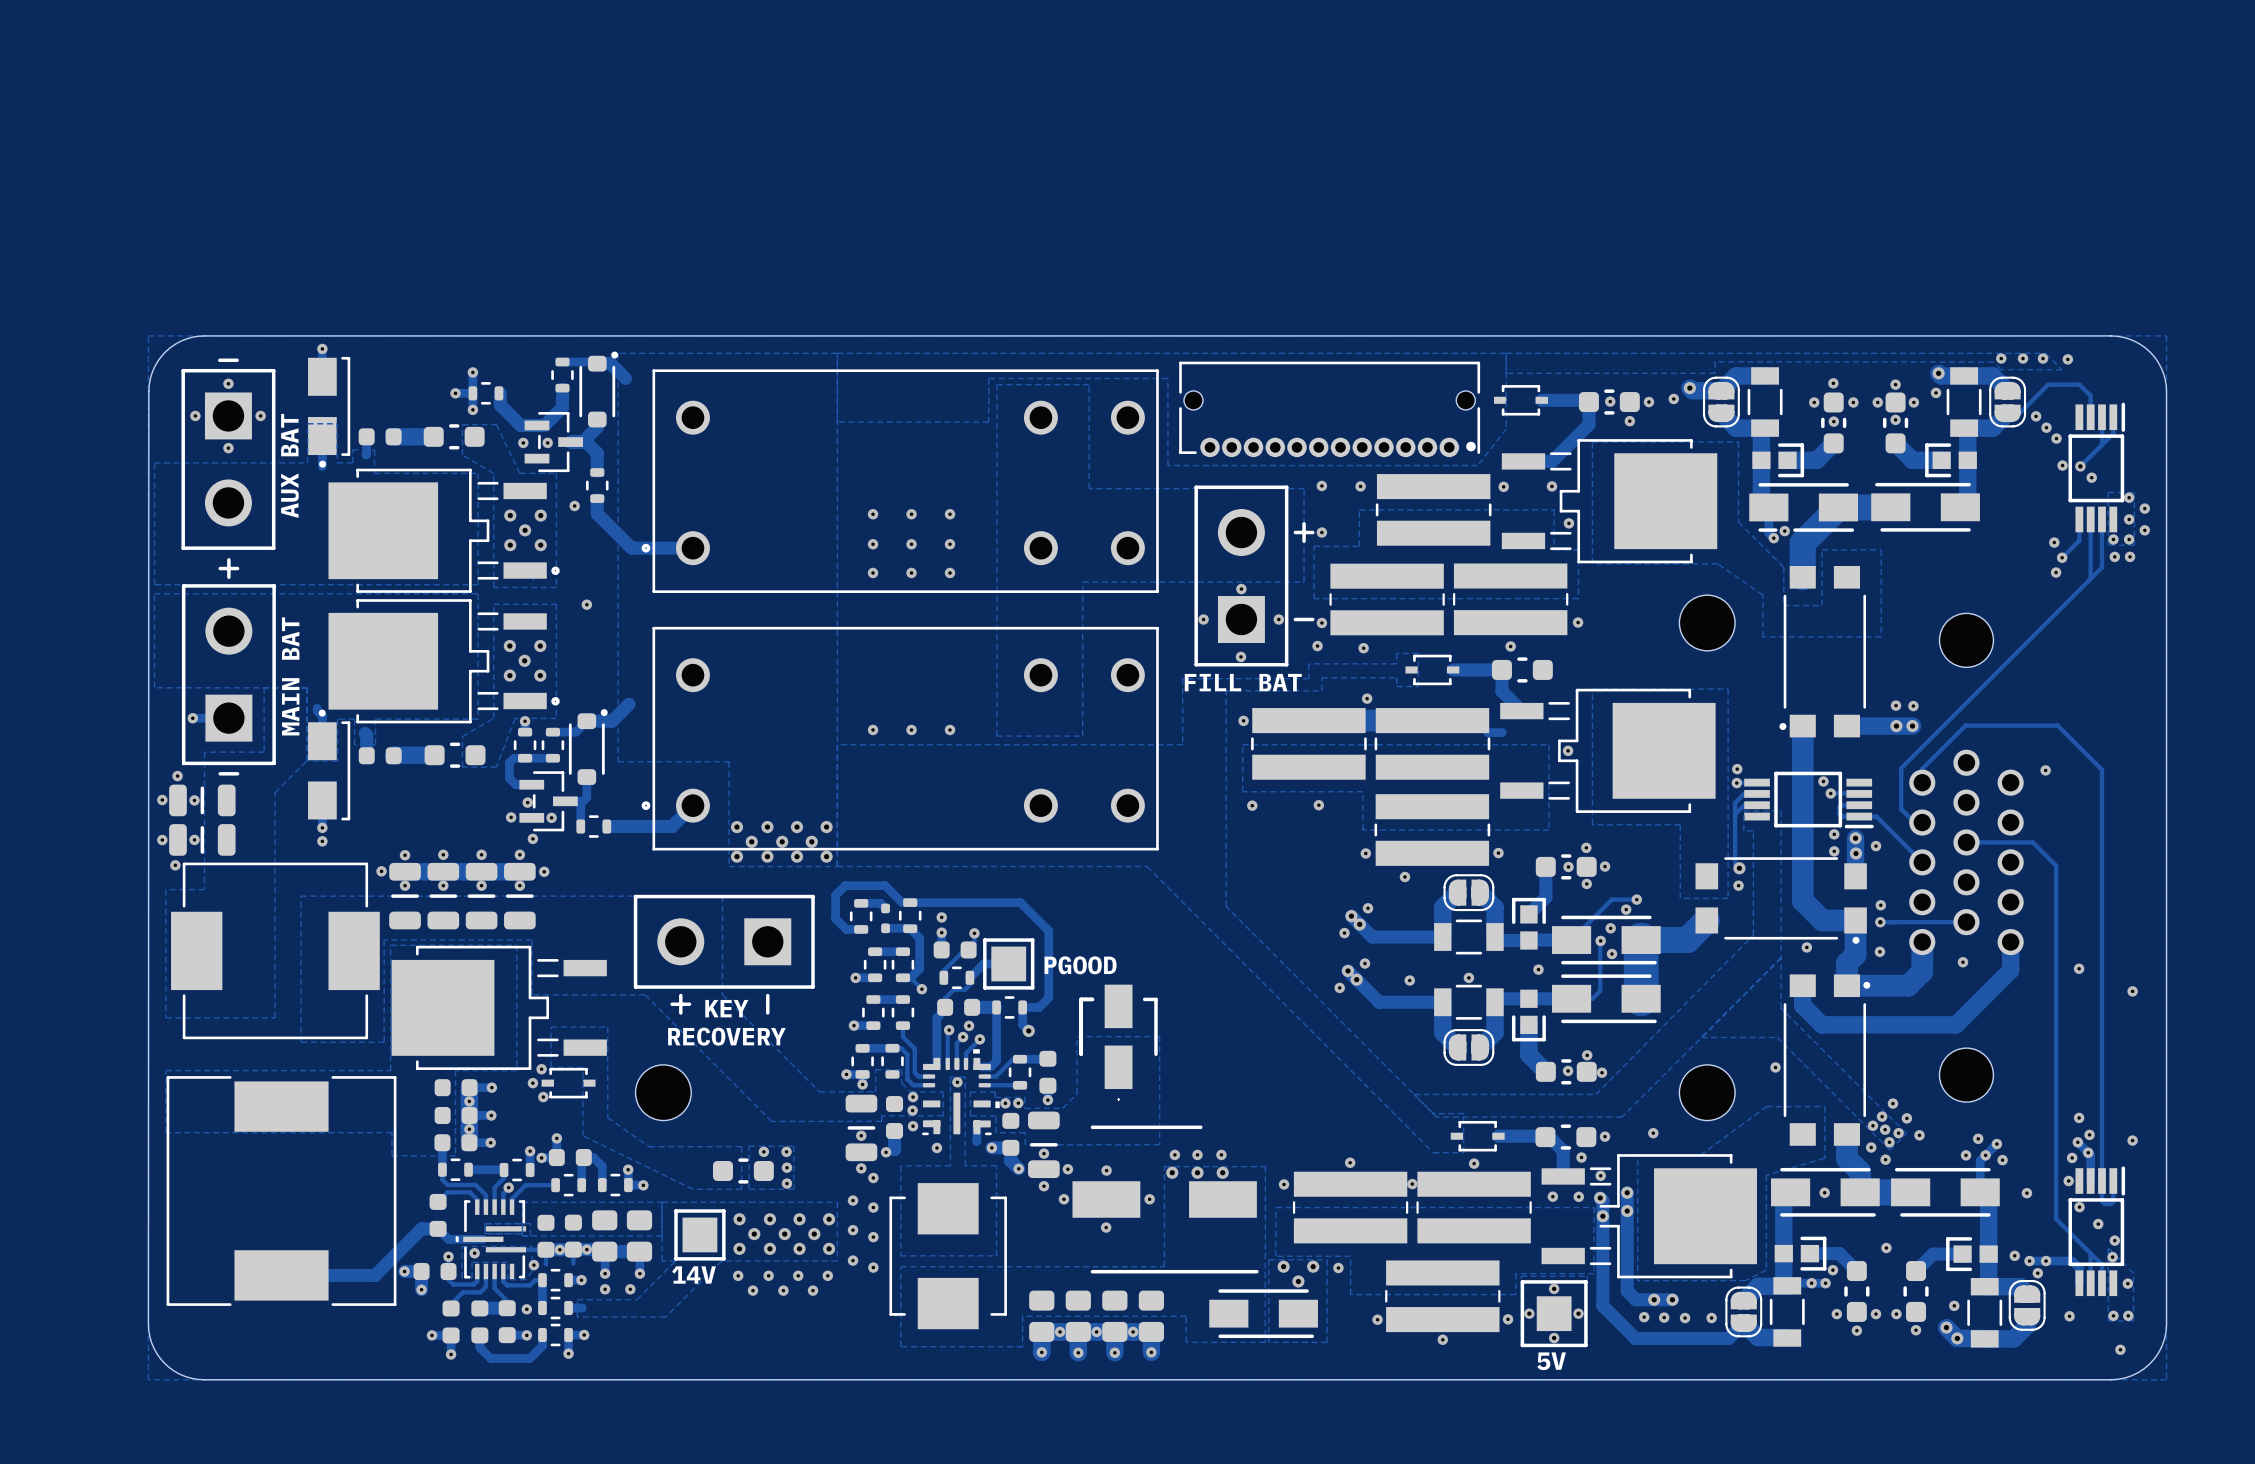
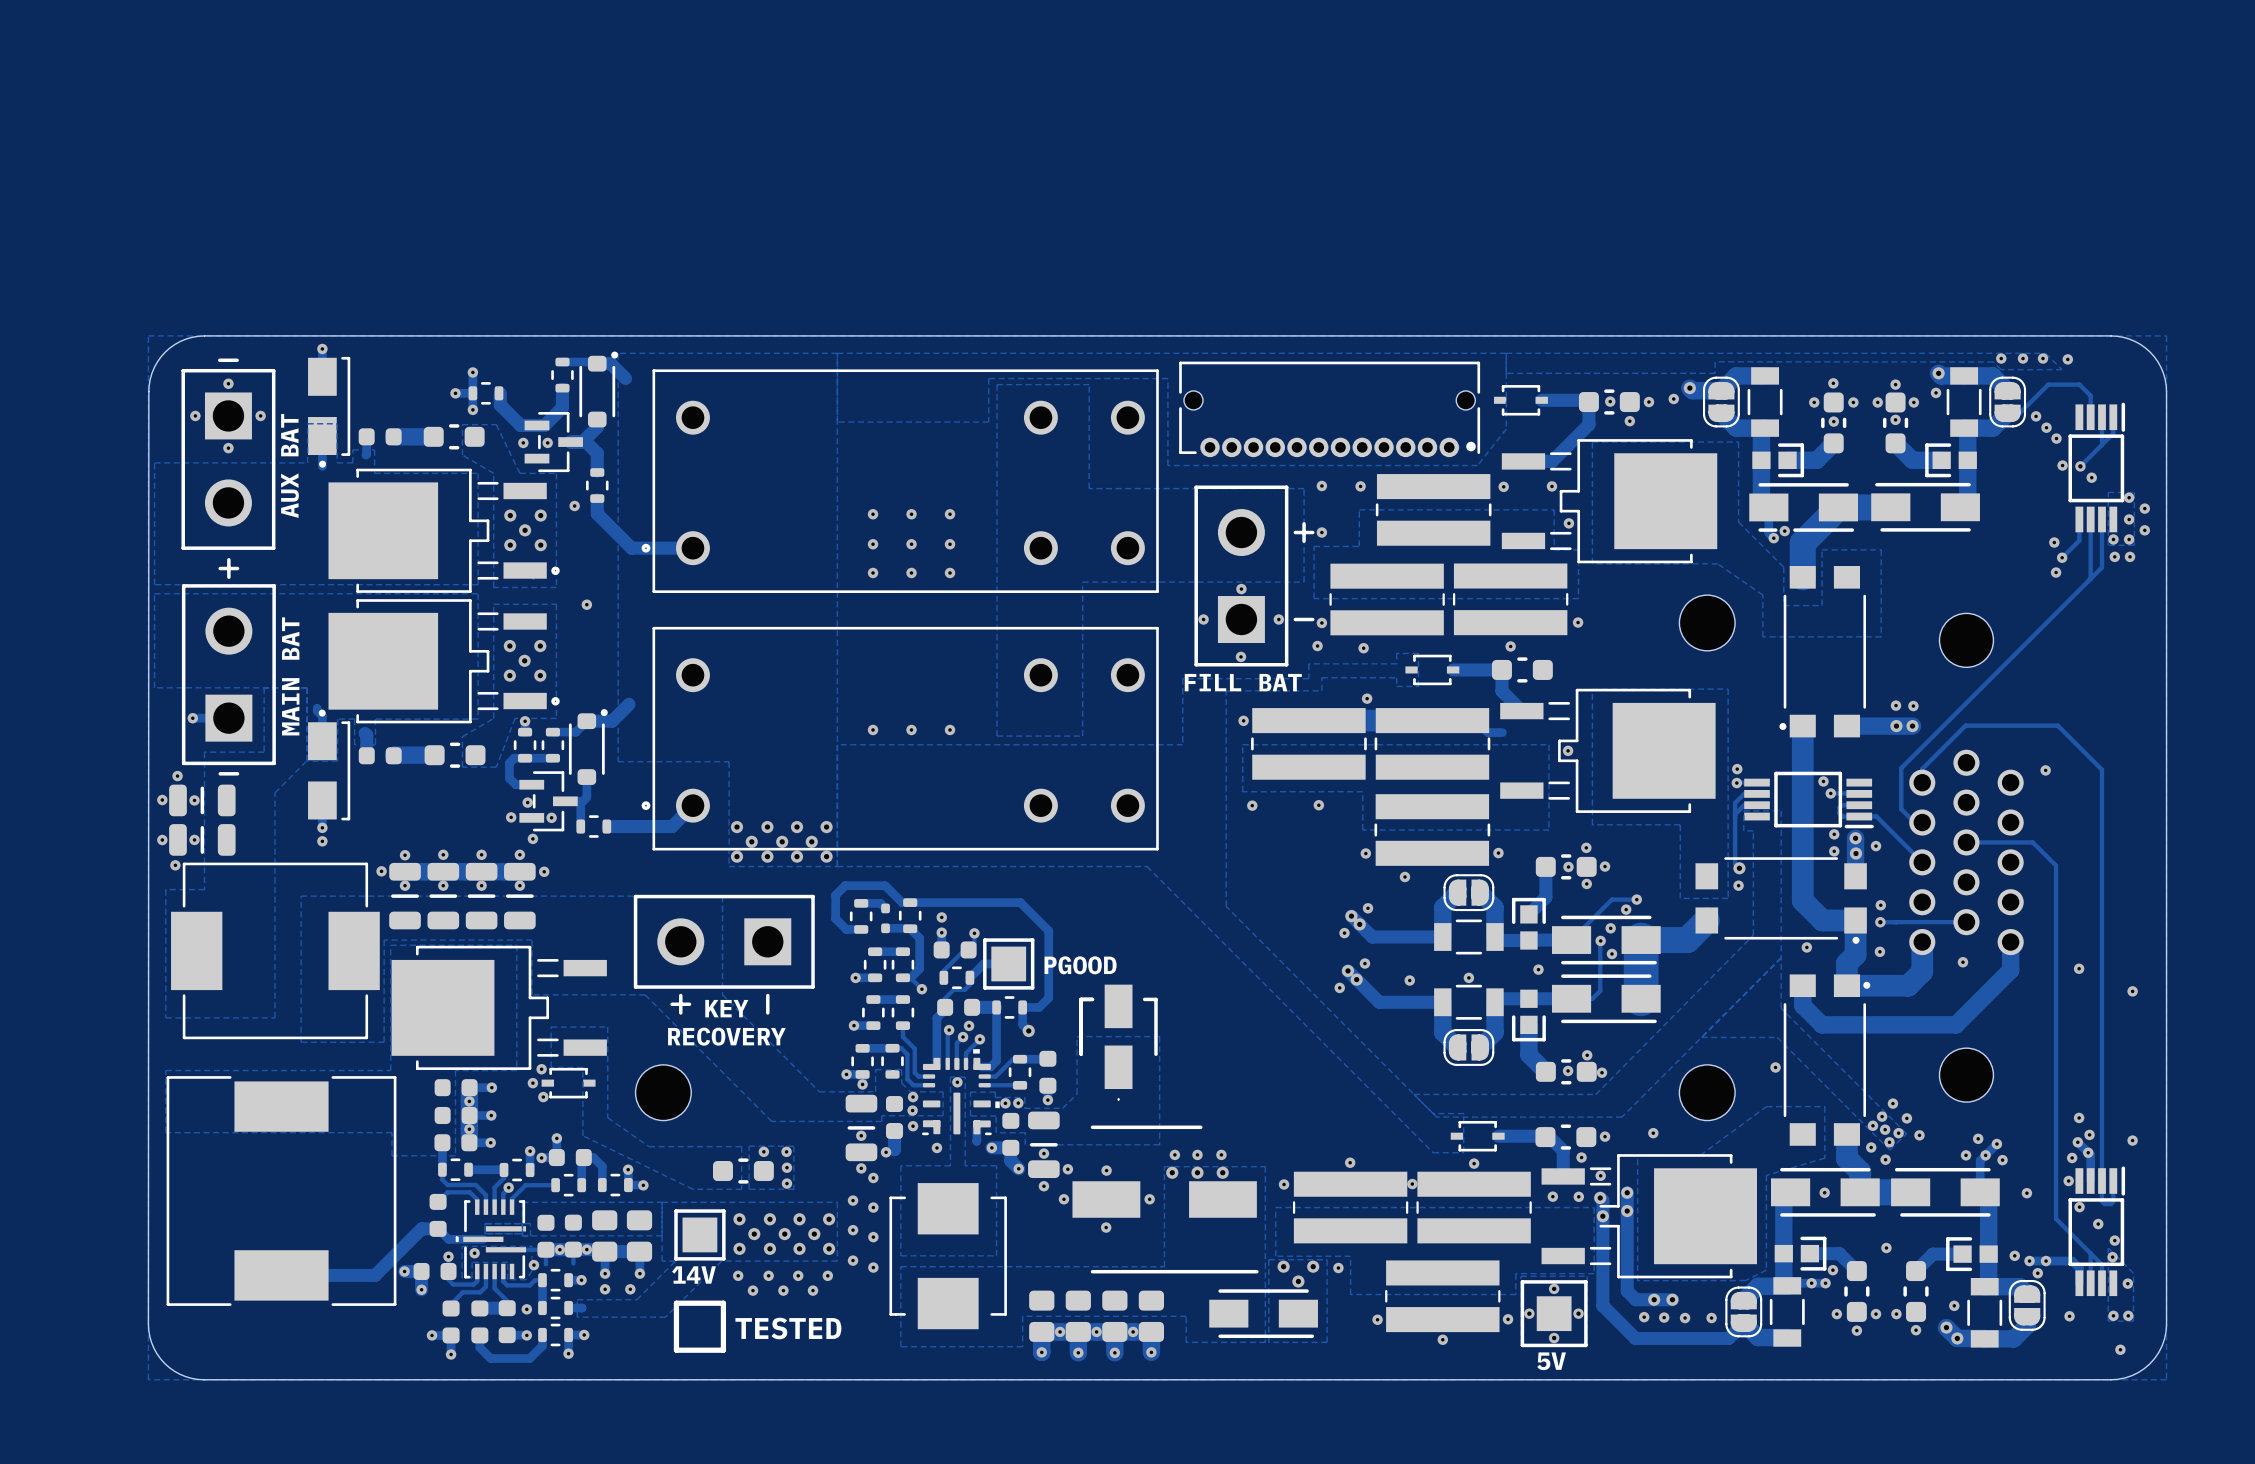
line: none -> (676, 1303) (723, 1303) (723, 1350) (676, 1350) (676, 1303)
text: none -> TESTED (788, 1328)

